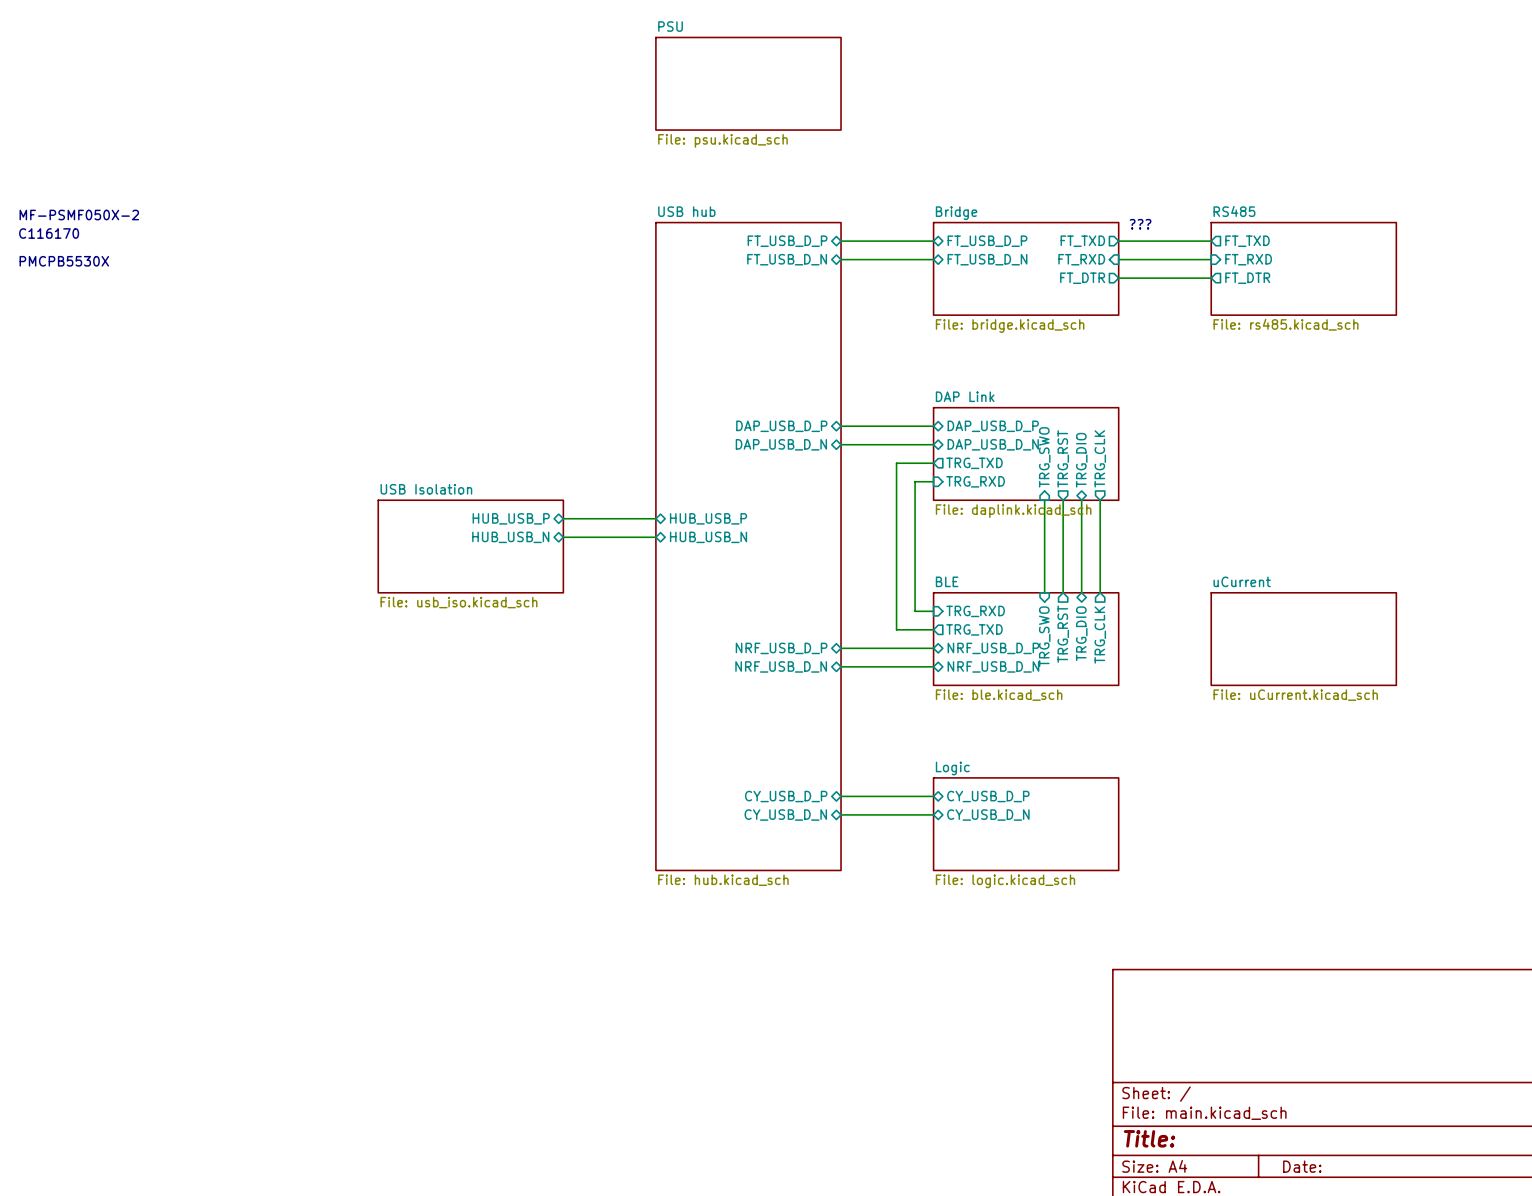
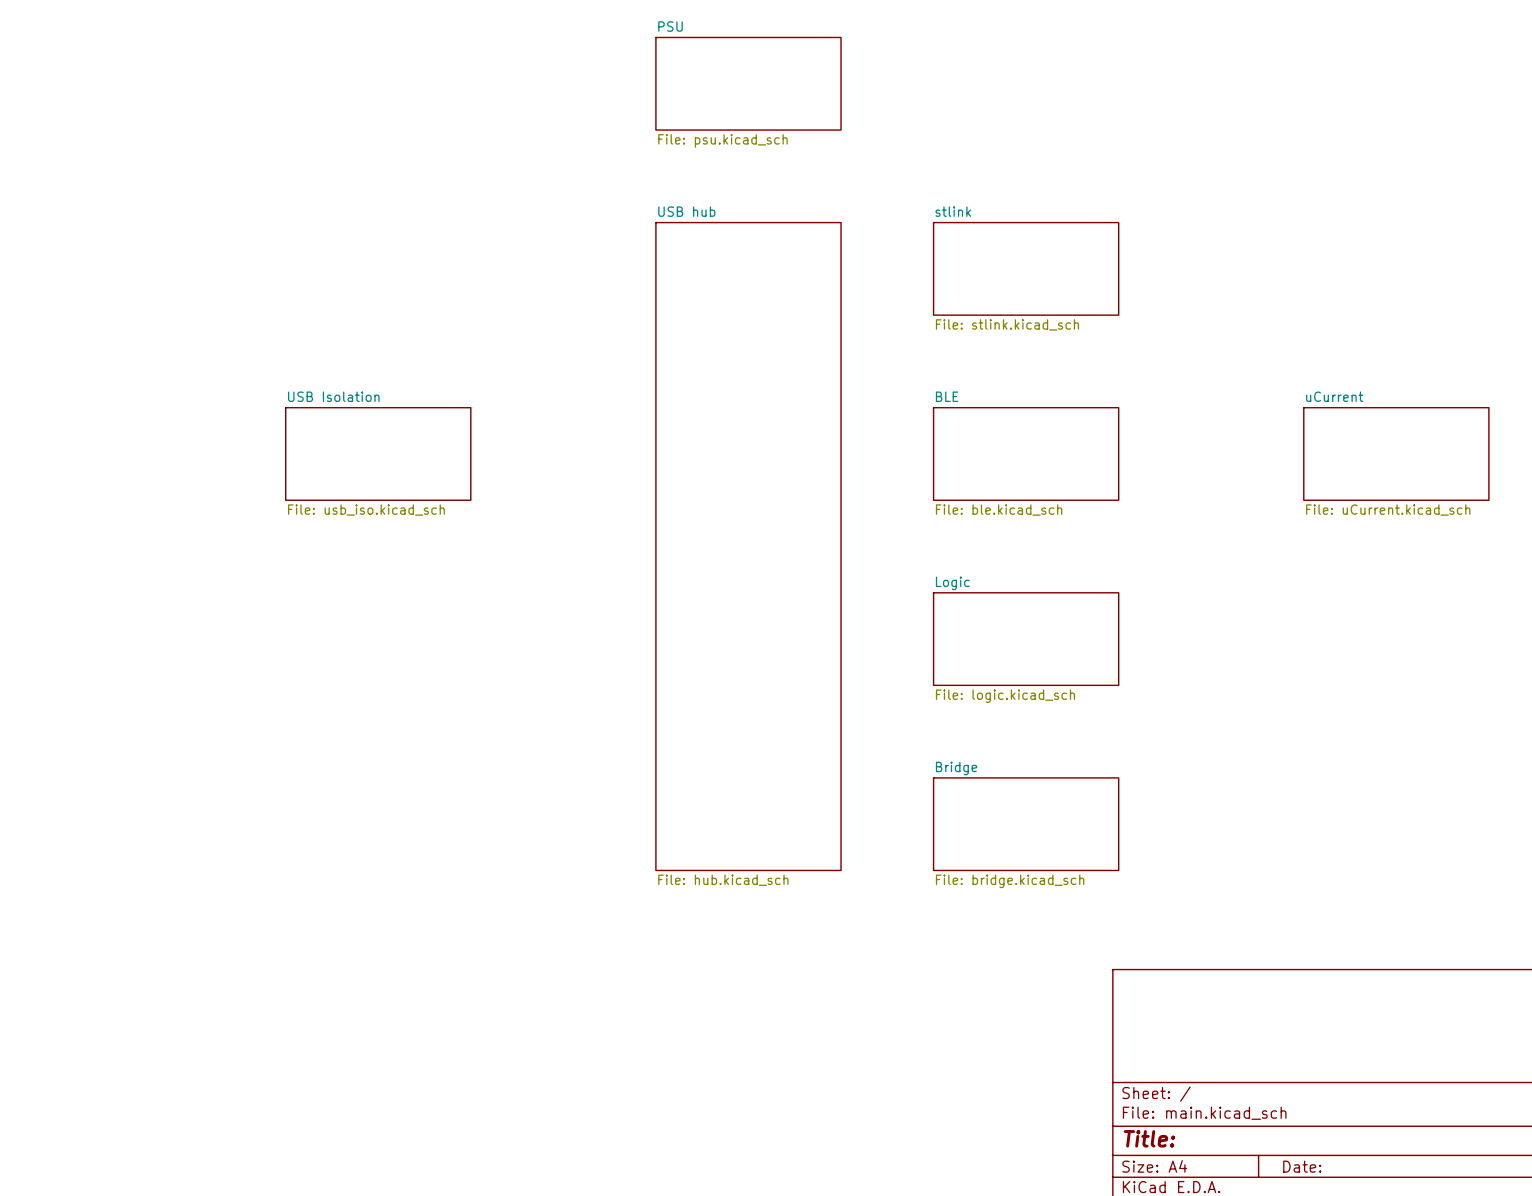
sheet Bridge name: Bridge (956, 213) -> stlink (953, 211)
text: MF-PSMF050X-2 (79, 215) -> none
text: ??? (1140, 224) -> none
text: C116170 (49, 233) -> none
sheet pin: FT_USB_D_P (787, 241) -> none
wire: (841, 241) (933, 241) -> none
sheet pin: FT_USB_D_P (987, 241) -> none
sheet pin: FT_TXD (1082, 241) -> none
wire: (1118, 241) (1211, 241) -> none
sheet pin: FT_TXD (1247, 241) -> none
sheet pin: FT_USB_D_N (787, 259) -> none
wire: (841, 259) (933, 259) -> none
sheet pin: FT_USB_D_N (987, 259) -> none
sheet pin: FT_RXD (1081, 259) -> none
wire: (1118, 259) (1211, 259) -> none
sheet pin: FT_RXD (1248, 259) -> none
text: PMCPB5530X (64, 261) -> none
sheet RS485: File: rs485.kicad_sch (1303, 268) -> none
sheet pin: FT_DTR (1082, 278) -> none
wire: (1118, 278) (1211, 278) -> none
sheet pin: FT_DTR (1247, 278) -> none
sheet Bridge value: File: bridge.kicad_sch (1010, 326) -> File: stlink.kicad_sch (1007, 324)
sheet DAP Link name: DAP Link (965, 396) -> BLE (947, 396)
sheet pin: DAP_USB_D_P (781, 426) -> none
wire: (841, 426) (933, 426) -> none
sheet pin: DAP_USB_D_P (993, 426) -> none
sheet pin: DAP_USB_D_N (781, 444) -> none
wire: (841, 444) (933, 444) -> none
sheet pin: DAP_USB_D_N (993, 444) -> none
sheet uCurrent: none -> File: uCurrent.kicad_sch (1396, 453)
sheet pin: TRG_SWO (1044, 457) -> none
sheet pin: TRG_RST (1063, 458) -> none
sheet pin: TRG_CLK (1100, 458) -> none
sheet pin: TRG_DIO (1081, 460) -> none
wire: (933, 463) (896, 463) (896, 629) (933, 629) -> none
sheet pin: TRG_TXD (974, 463) -> none
wire: (933, 481) (915, 481) (915, 611) (933, 611) -> none
sheet pin: TRG_RXD (975, 481) -> none
wire: (1044, 500) (1044, 592) -> none
wire: (1063, 500) (1063, 592) -> none
wire: (1081, 500) (1081, 592) -> none
wire: (1100, 500) (1100, 592) -> none
sheet DAP Link value: File: daplink.kicad_sch (1013, 511) -> File: ble.kicad_sch (999, 510)
sheet pin: HUB_USB_P (511, 518) -> none
wire: (563, 518) (655, 518) -> none
sheet pin: HUB_USB_P (708, 518) -> none
sheet pin: HUB_USB_N (510, 537) -> none
wire: (563, 537) (655, 537) -> none
sheet pin: HUB_USB_N (708, 537) -> none
sheet USB Isolation position: (470, 546) -> (378, 453)
sheet BLE name: BLE (947, 581) -> Logic (952, 583)
sheet pin: TRG_RXD (975, 611) -> none
sheet pin: TRG_TXD (974, 629) -> none
sheet pin: TRG_DIO (1081, 633) -> none
sheet pin: TRG_RST (1063, 634) -> none
sheet pin: TRG_CLK (1100, 635) -> none
sheet pin: TRG_SWO (1044, 636) -> none
sheet uCurrent: File: uCurrent.kicad_sch (1303, 639) -> none
sheet pin: NRF_USB_D_P (781, 648) -> none
wire: (841, 648) (933, 648) -> none
sheet pin: NRF_USB_D_P (993, 648) -> none
sheet pin: NRF_USB_D_N (781, 666) -> none
wire: (841, 666) (933, 666) -> none
sheet pin: NRF_USB_D_N (993, 666) -> none
sheet BLE value: File: ble.kicad_sch (999, 695) -> File: logic.kicad_sch (1005, 696)
sheet Logic name: Logic (952, 768) -> Bridge (956, 768)
sheet pin: CY_USB_D_P (786, 796) -> none
wire: (841, 796) (933, 796) -> none
sheet pin: CY_USB_D_P (988, 796) -> none
wire: (841, 814) (933, 814) -> none
sheet pin: CY_USB_D_N (785, 815) -> none
sheet pin: CY_USB_D_N (988, 815) -> none
sheet Logic value: File: logic.kicad_sch (1005, 881) -> File: bridge.kicad_sch (1010, 881)

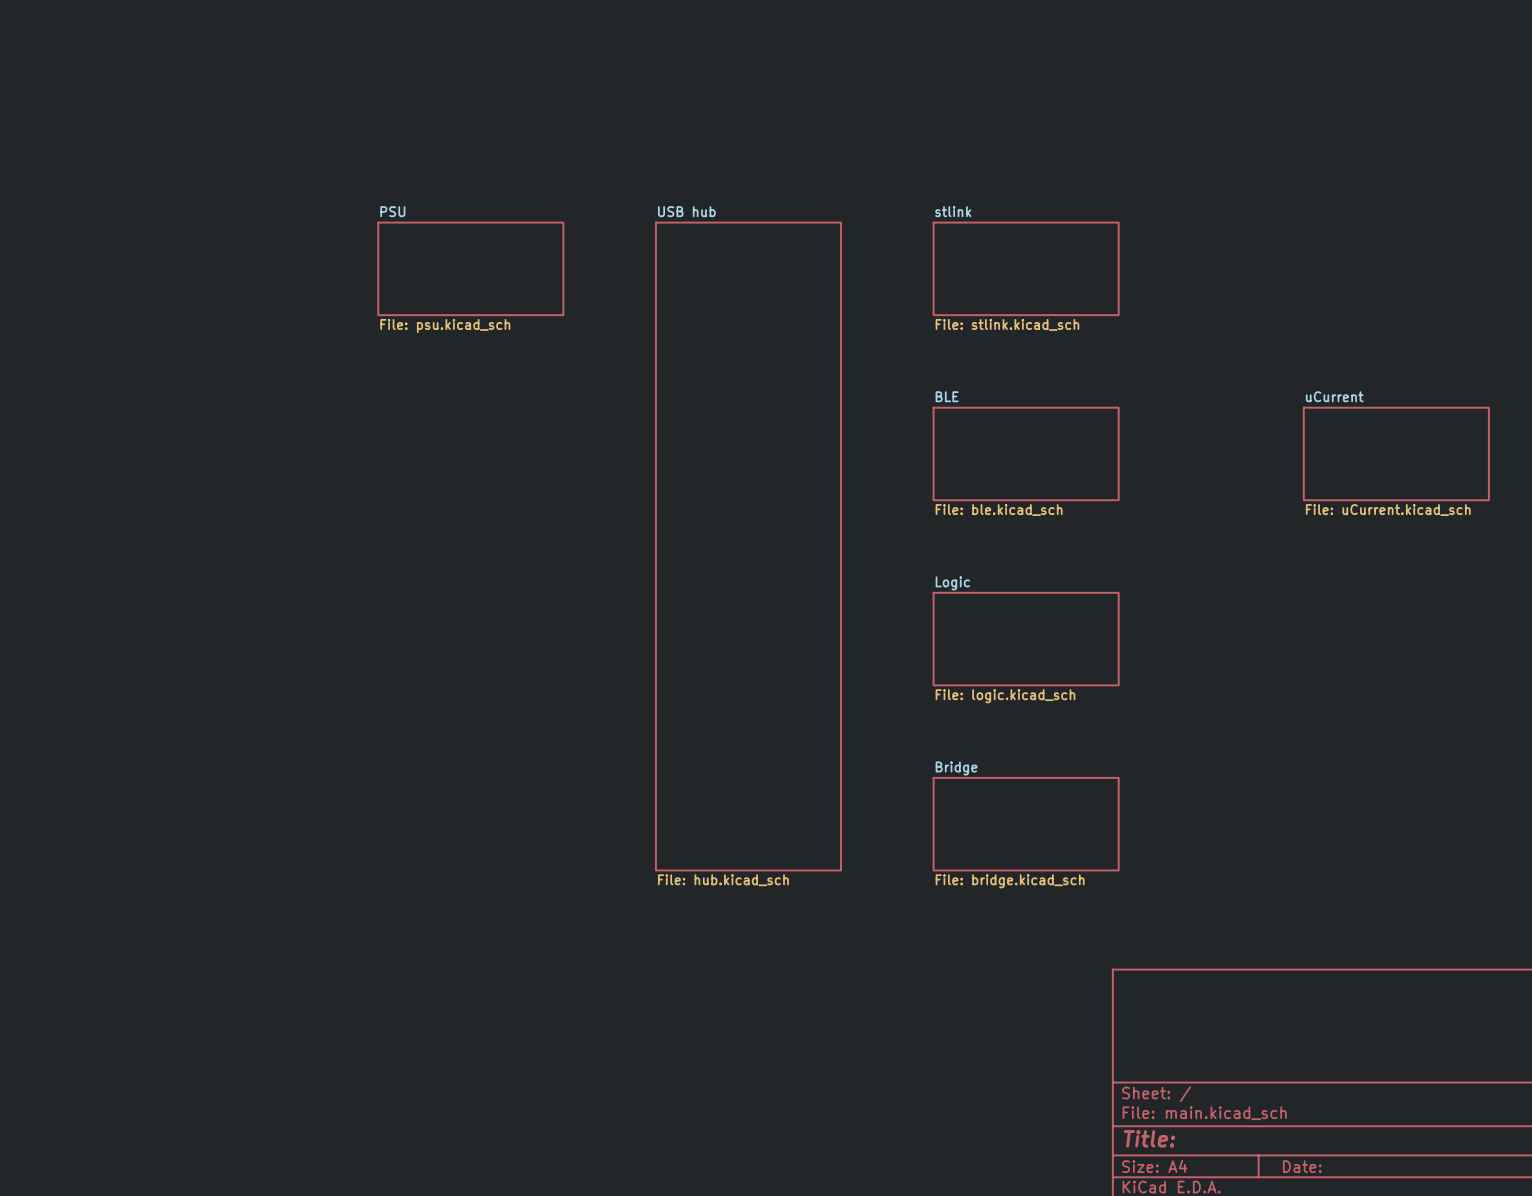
sheet PSU: File: psu.kicad_sch (748, 83) -> none
sheet PSU: none -> File: psu.kicad_sch (470, 268)
sheet USB Isolation: File: usb_iso.kicad_sch (378, 453) -> none

